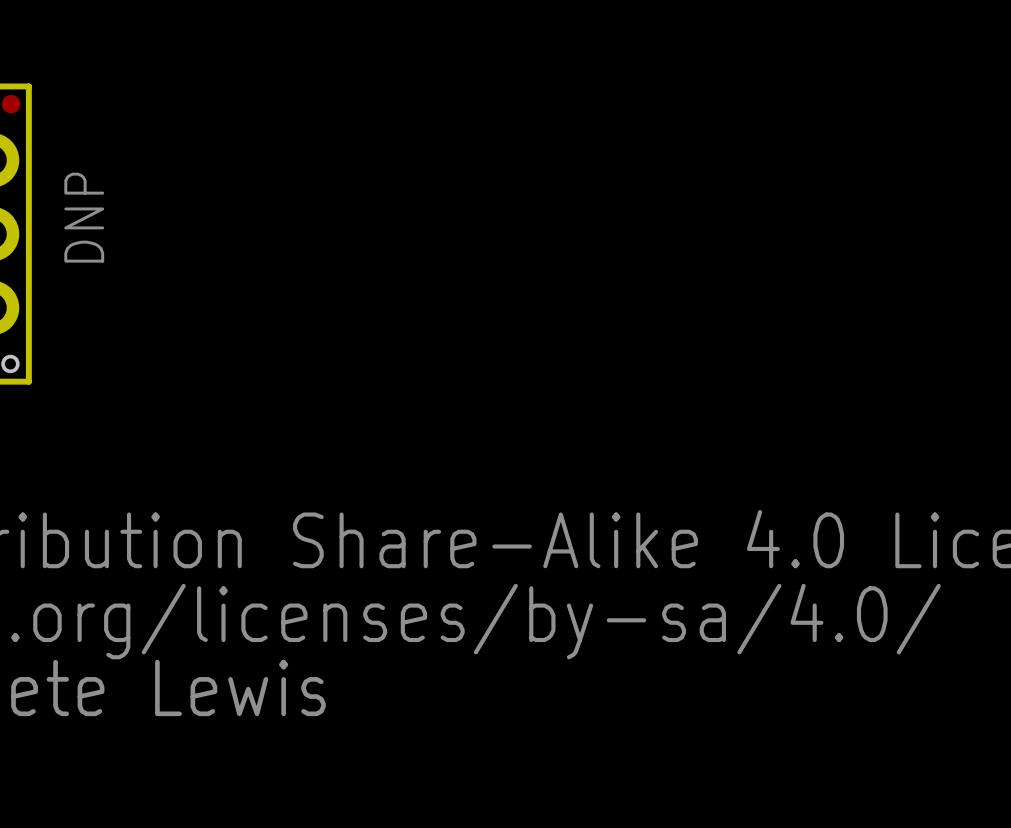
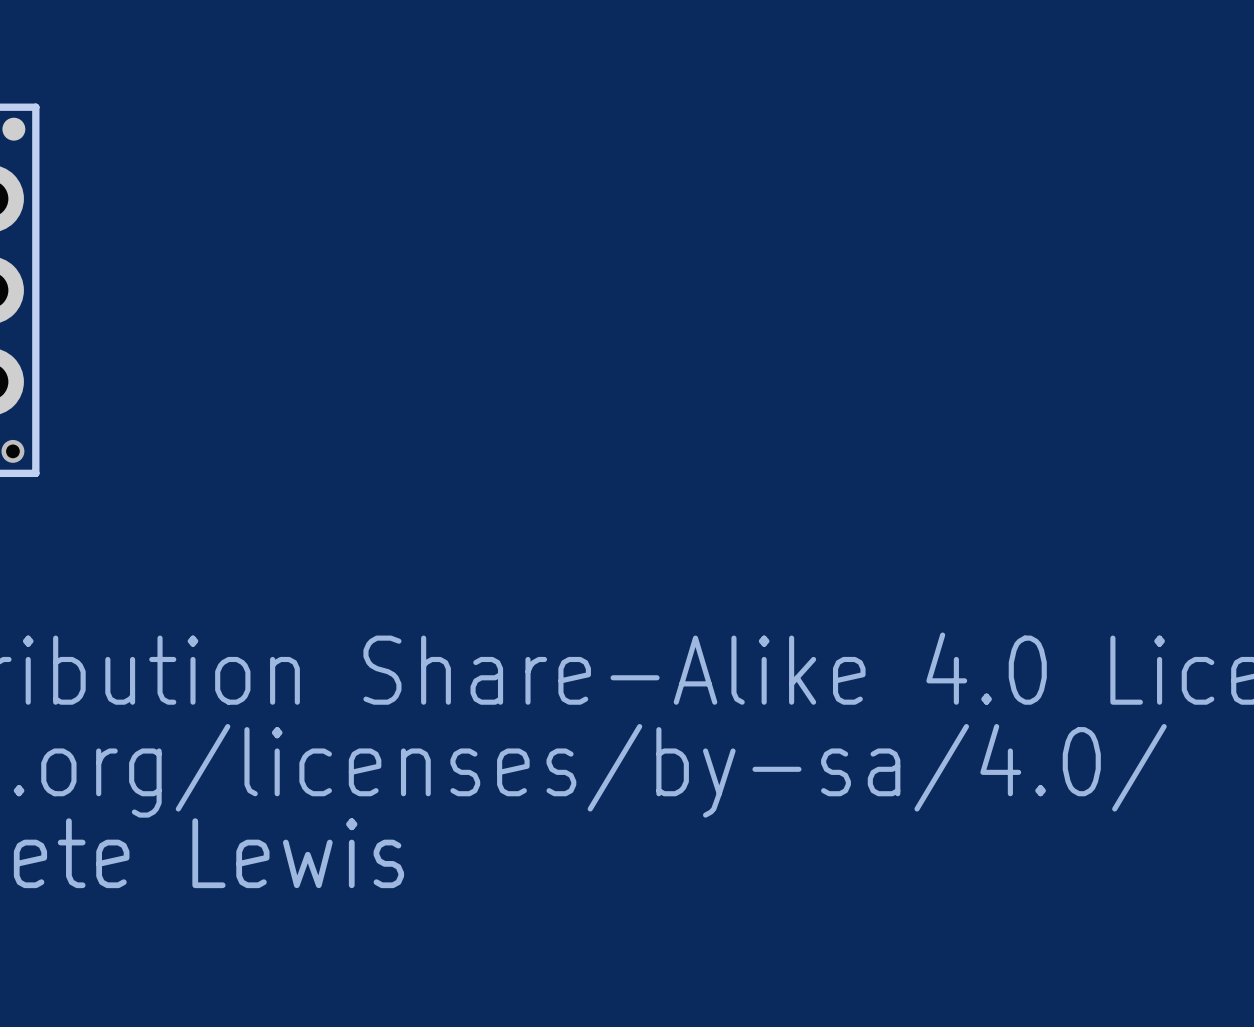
text: DNP (84, 217) -> none

